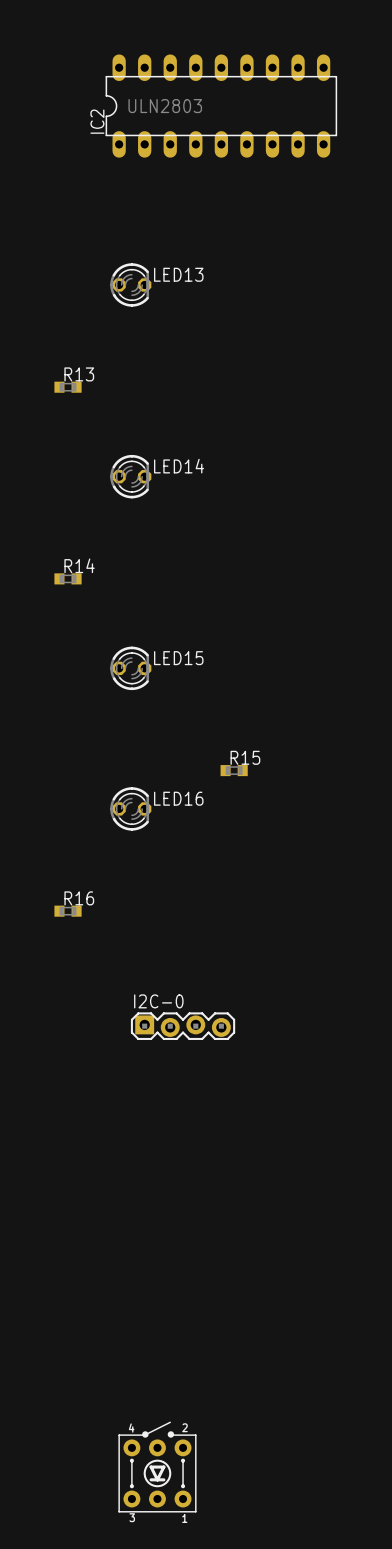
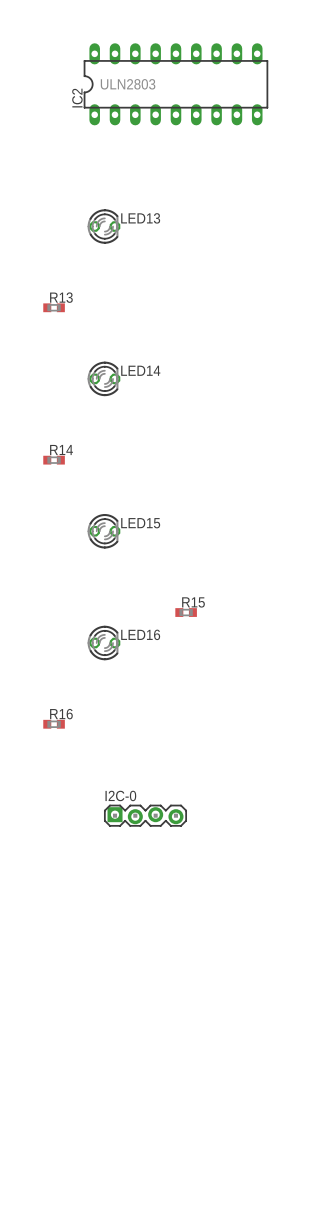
part: (157, 1467) -> none

